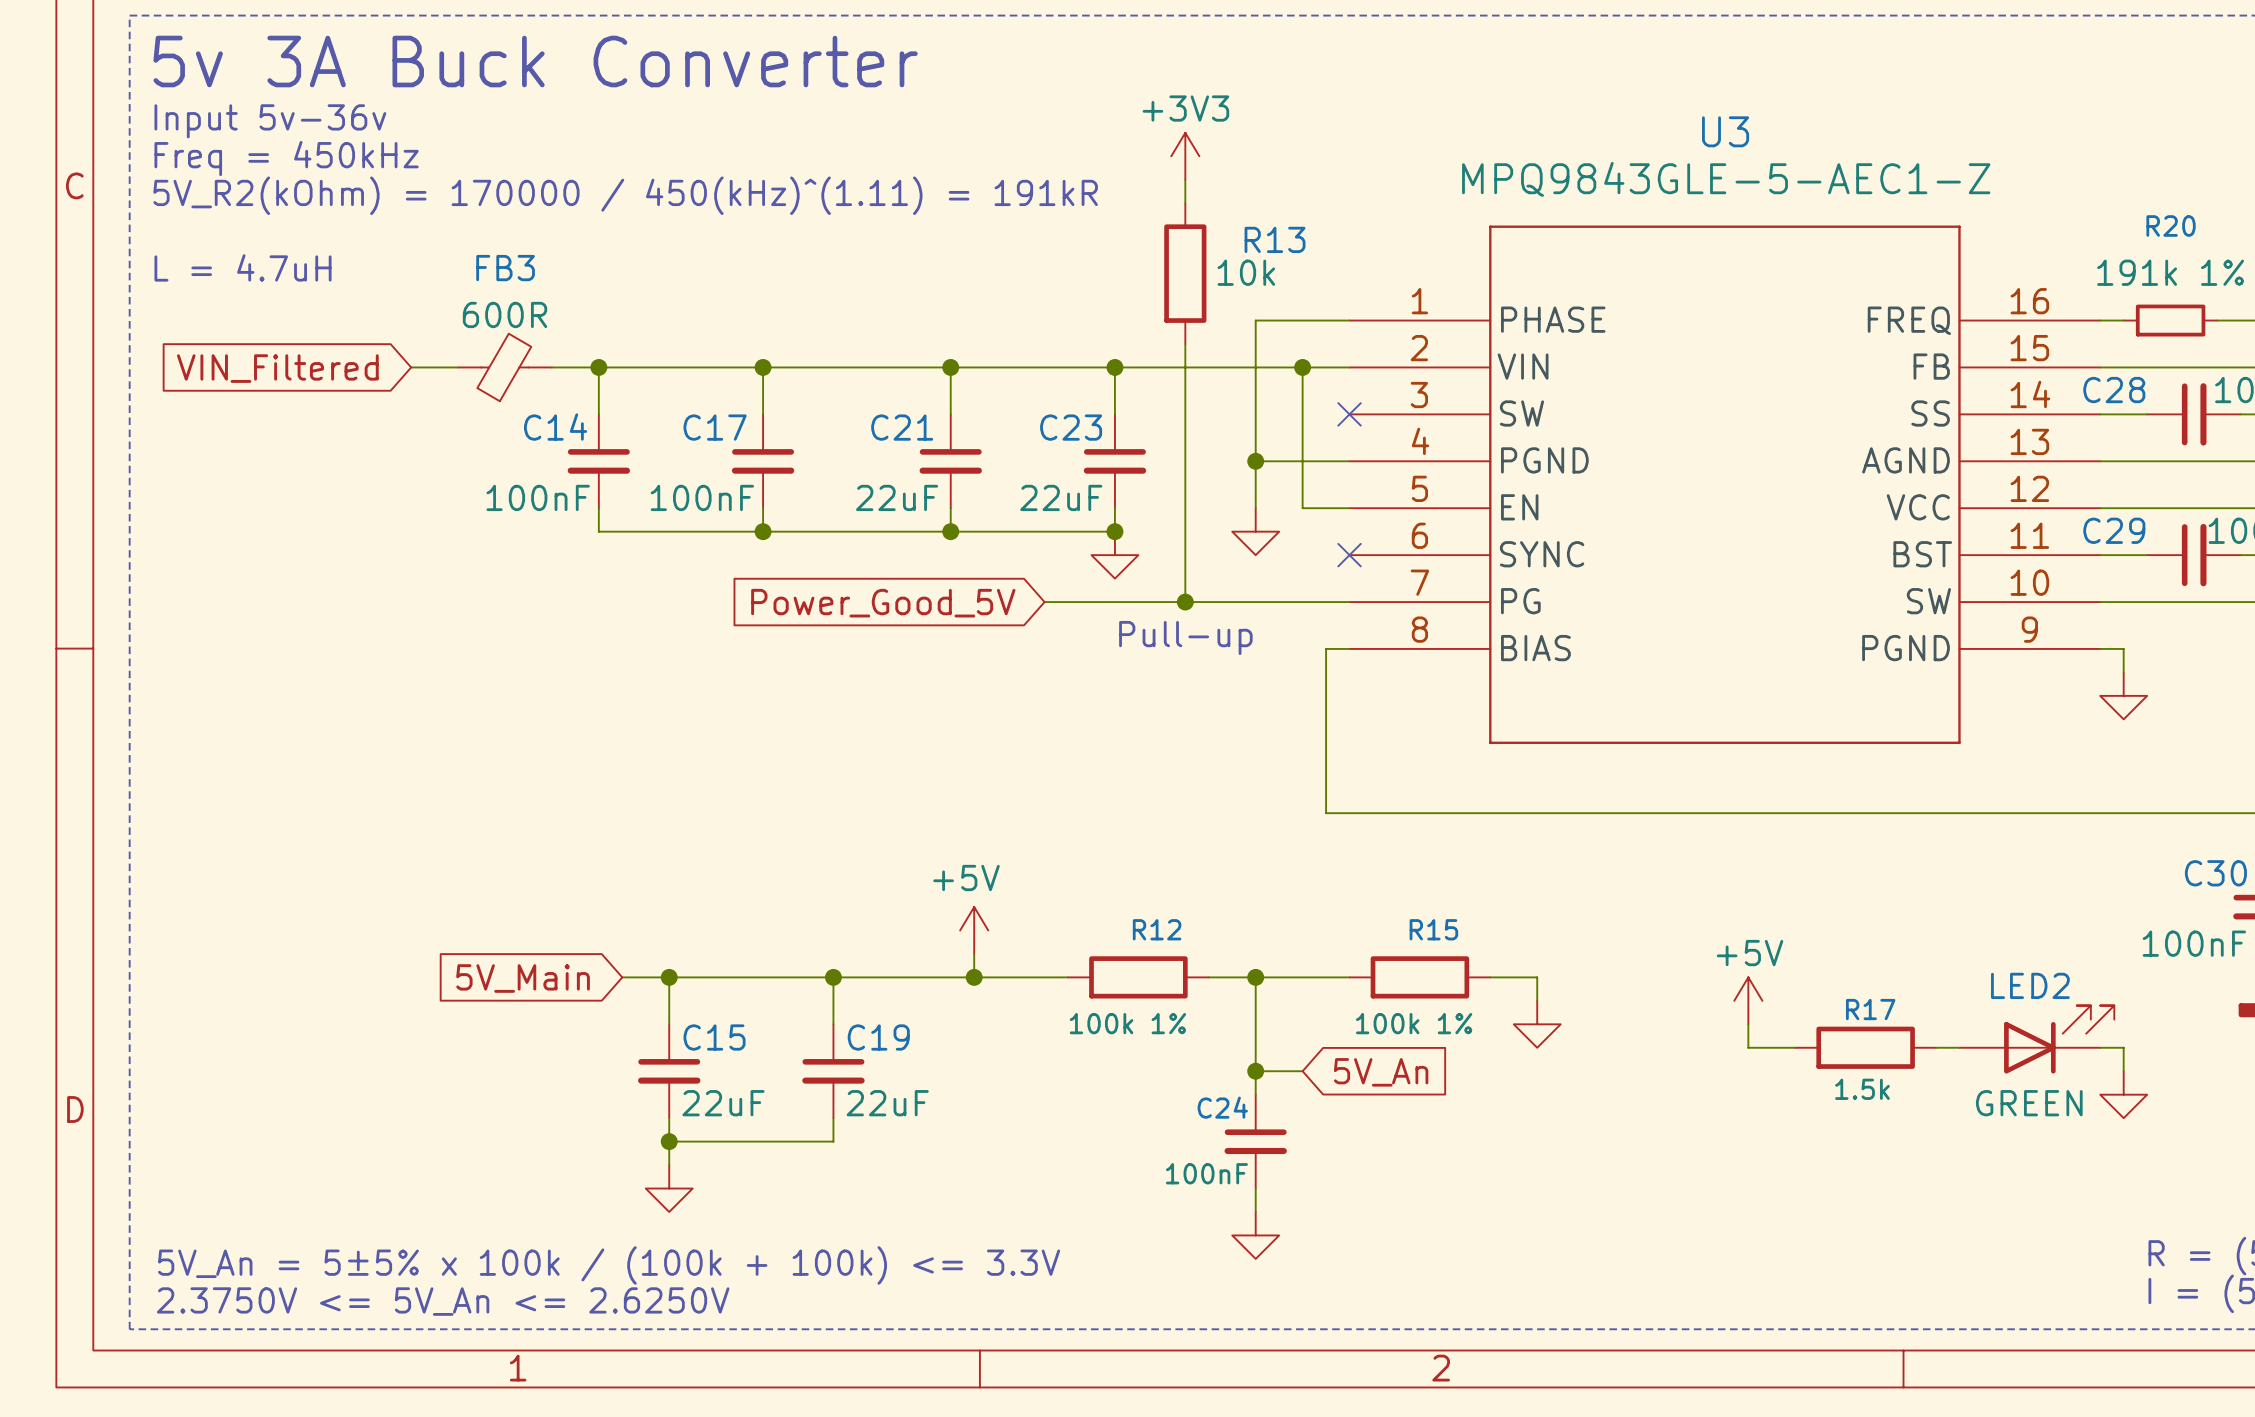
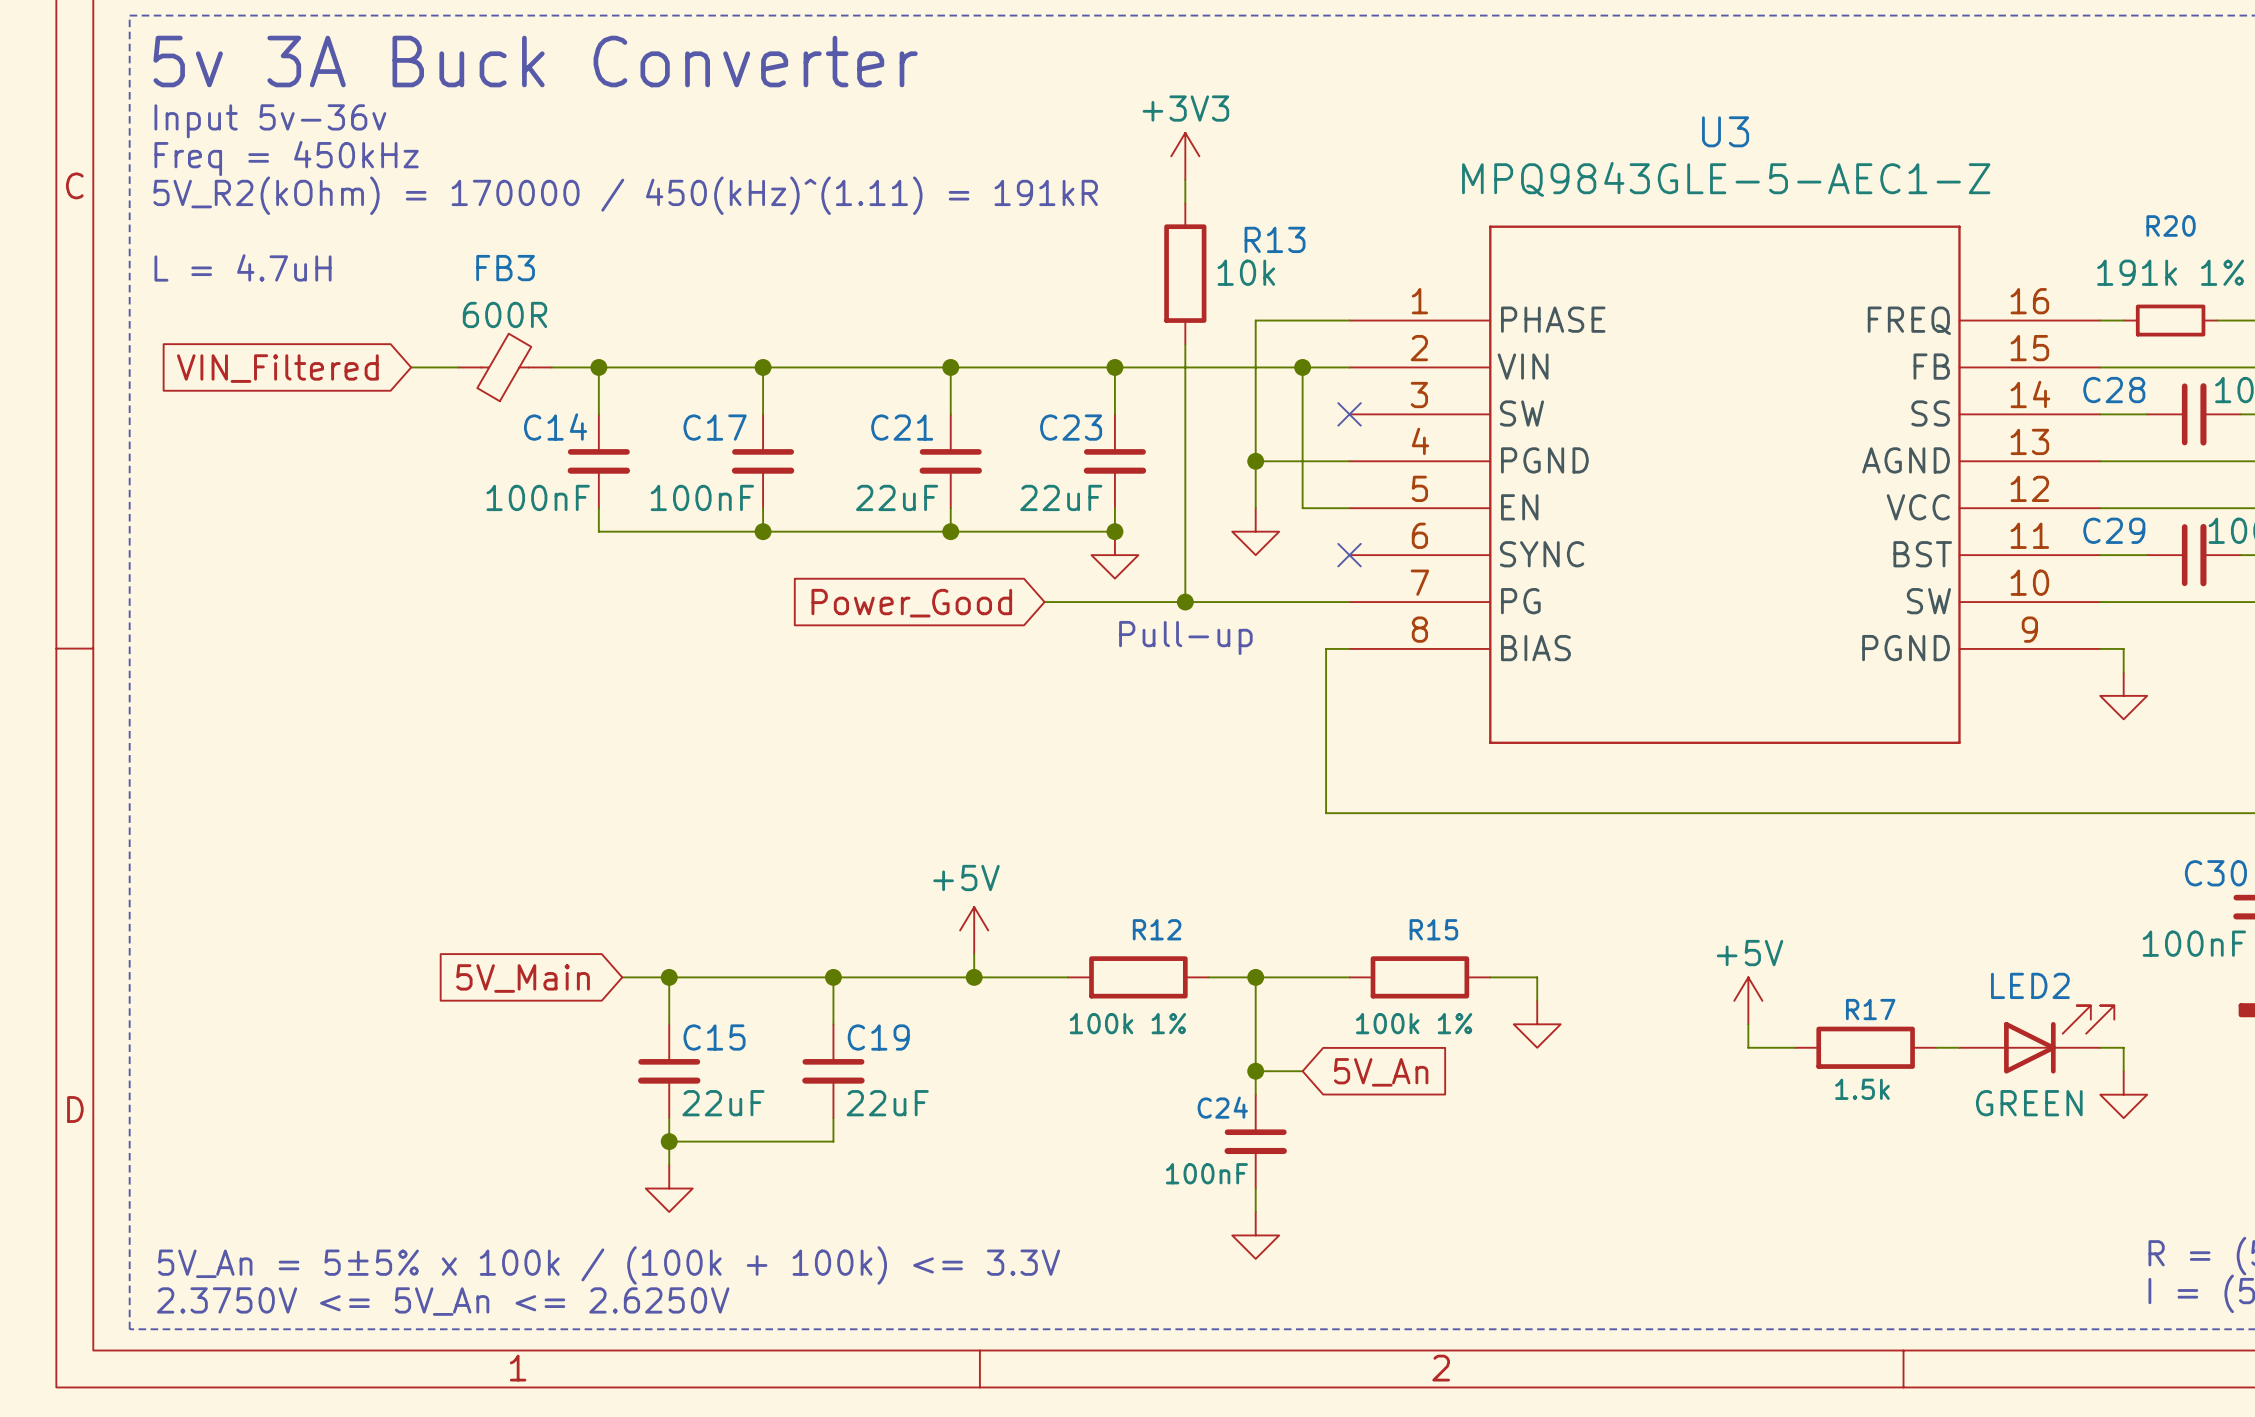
global label: Power_Good_5V (883, 603) -> Power_Good (911, 603)

